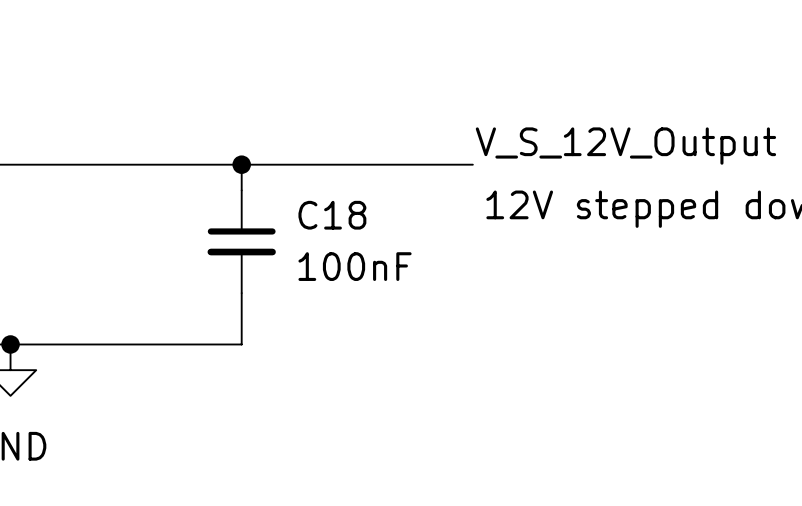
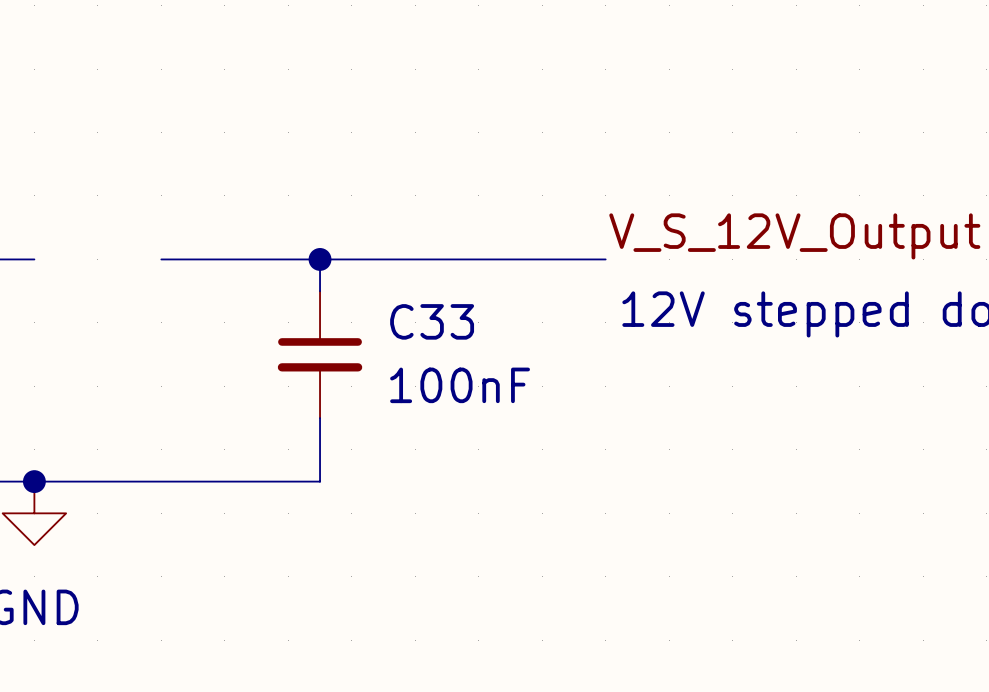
wire: (10, 164) (113, 164) -> none
C18 name: C18 (332, 215) -> C33 (432, 321)

